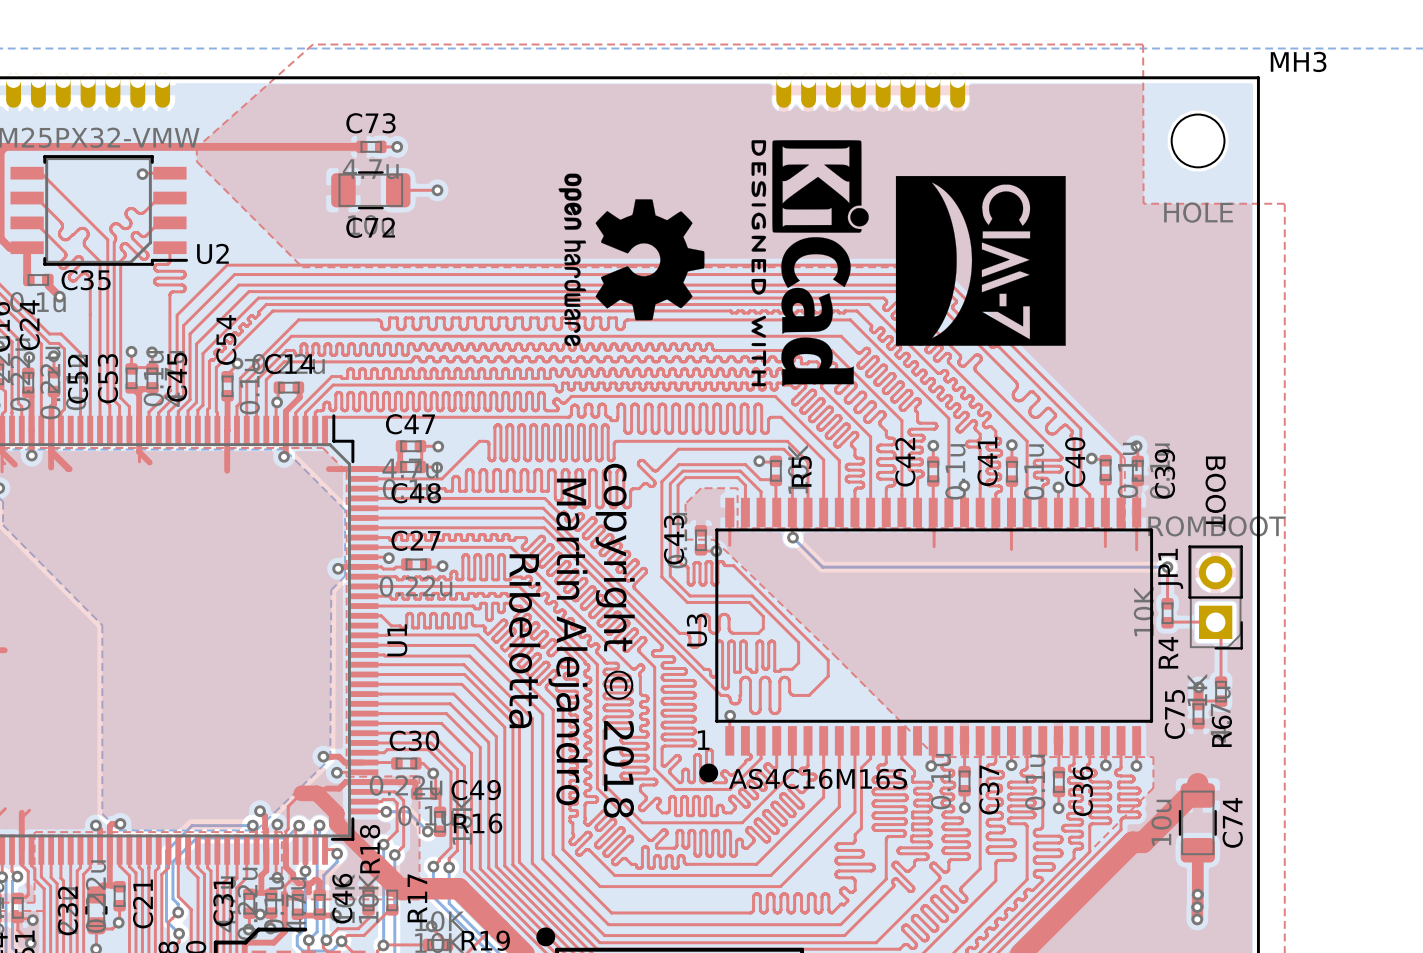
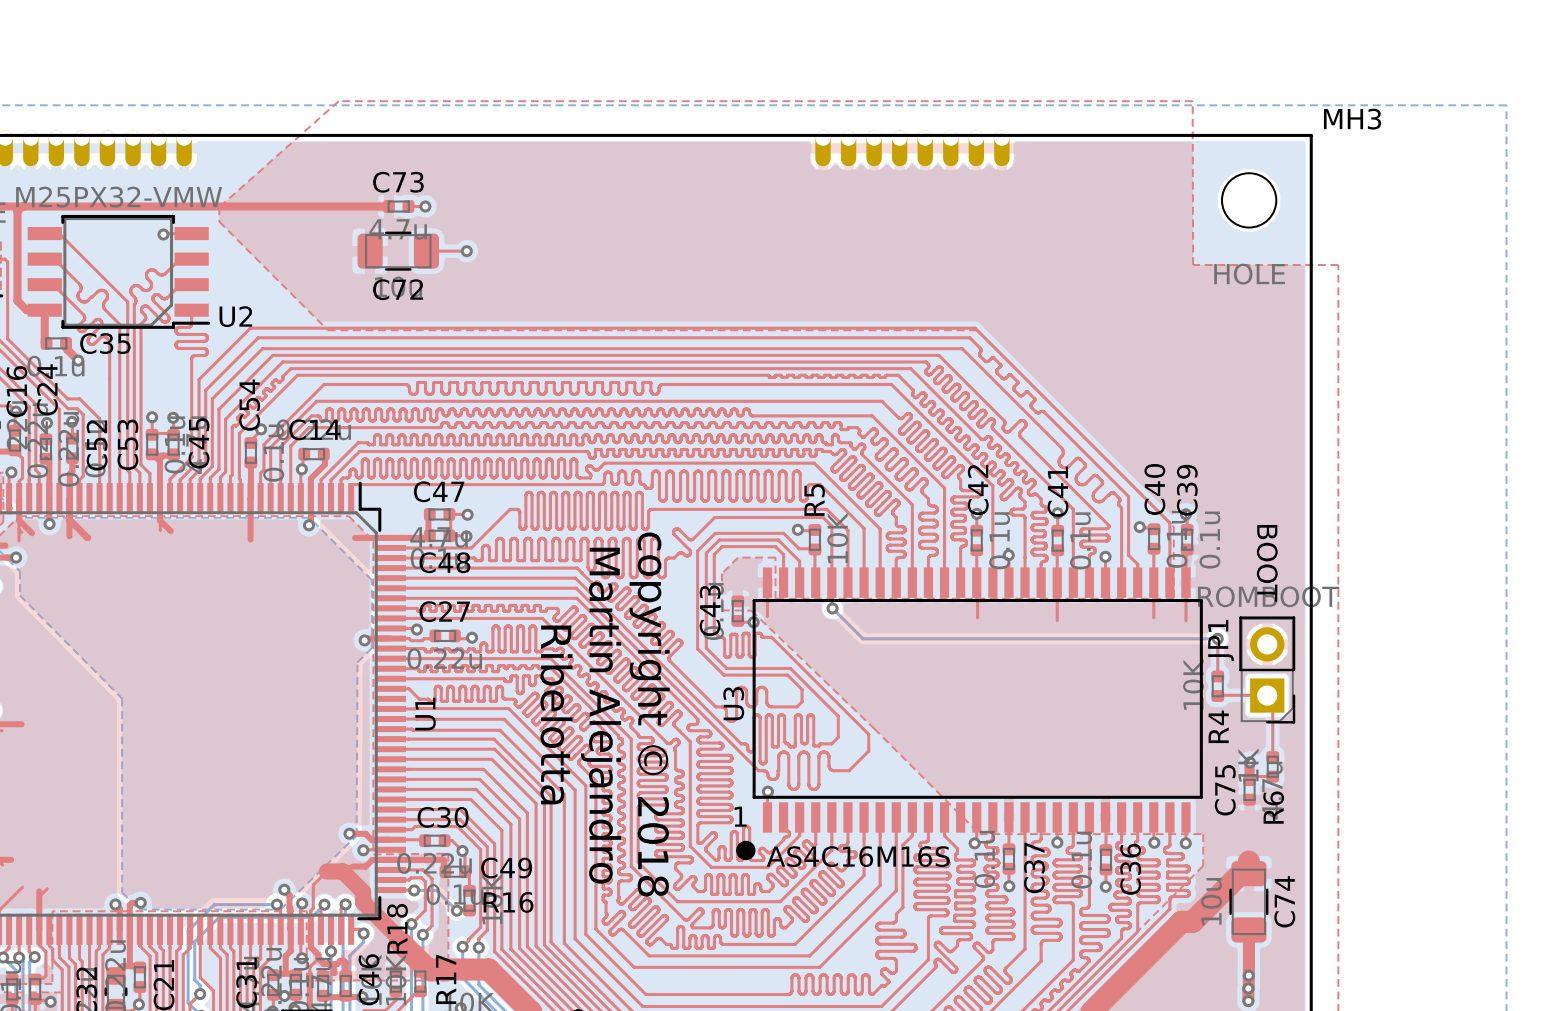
drawing: [751, 140, 869, 387] -> none
drawing: [558, 173, 705, 346] -> none
drawing: [895, 175, 1066, 346] -> none
C41 name position: C41 (987, 461) -> C41 (1057, 491)
C42 name position: C42 (905, 462) -> C42 (978, 490)
C40 name position: C40 (1075, 462) -> C40 (1154, 489)
R5 name position: R5 (801, 471) -> R5 (814, 500)
C39 name position: C39 (1164, 473) -> C39 (1187, 490)

